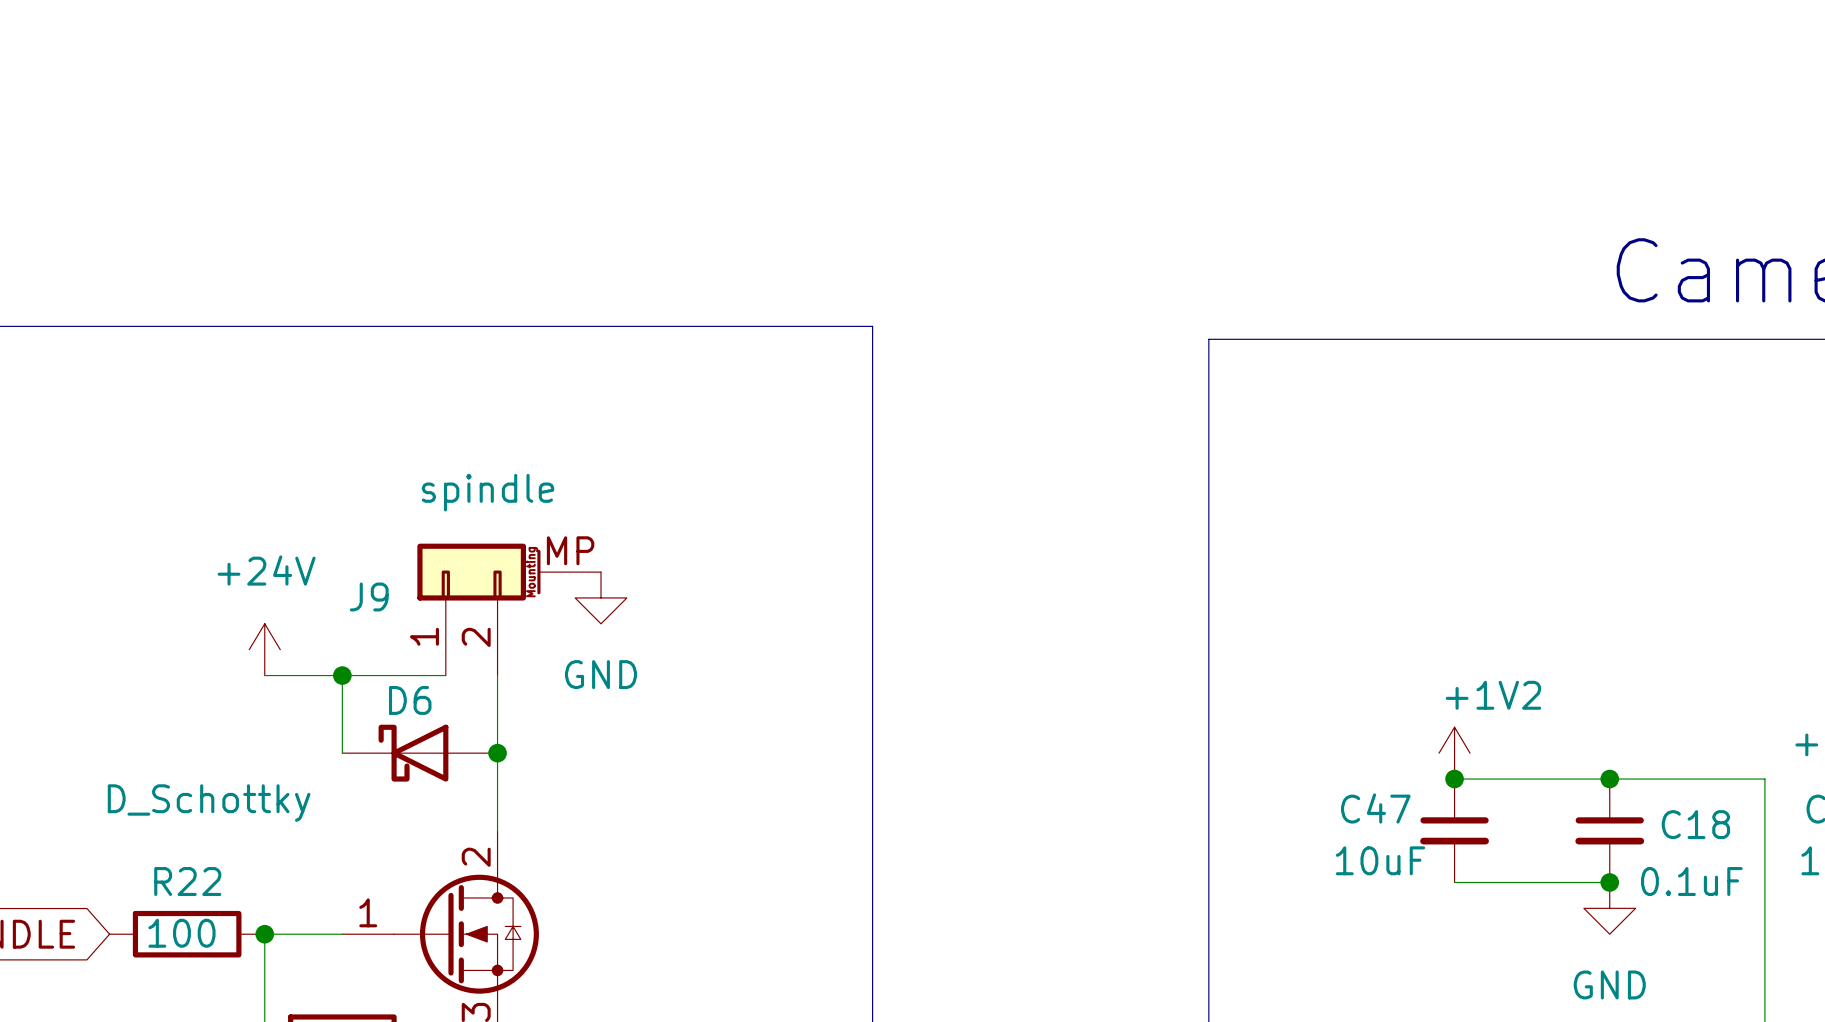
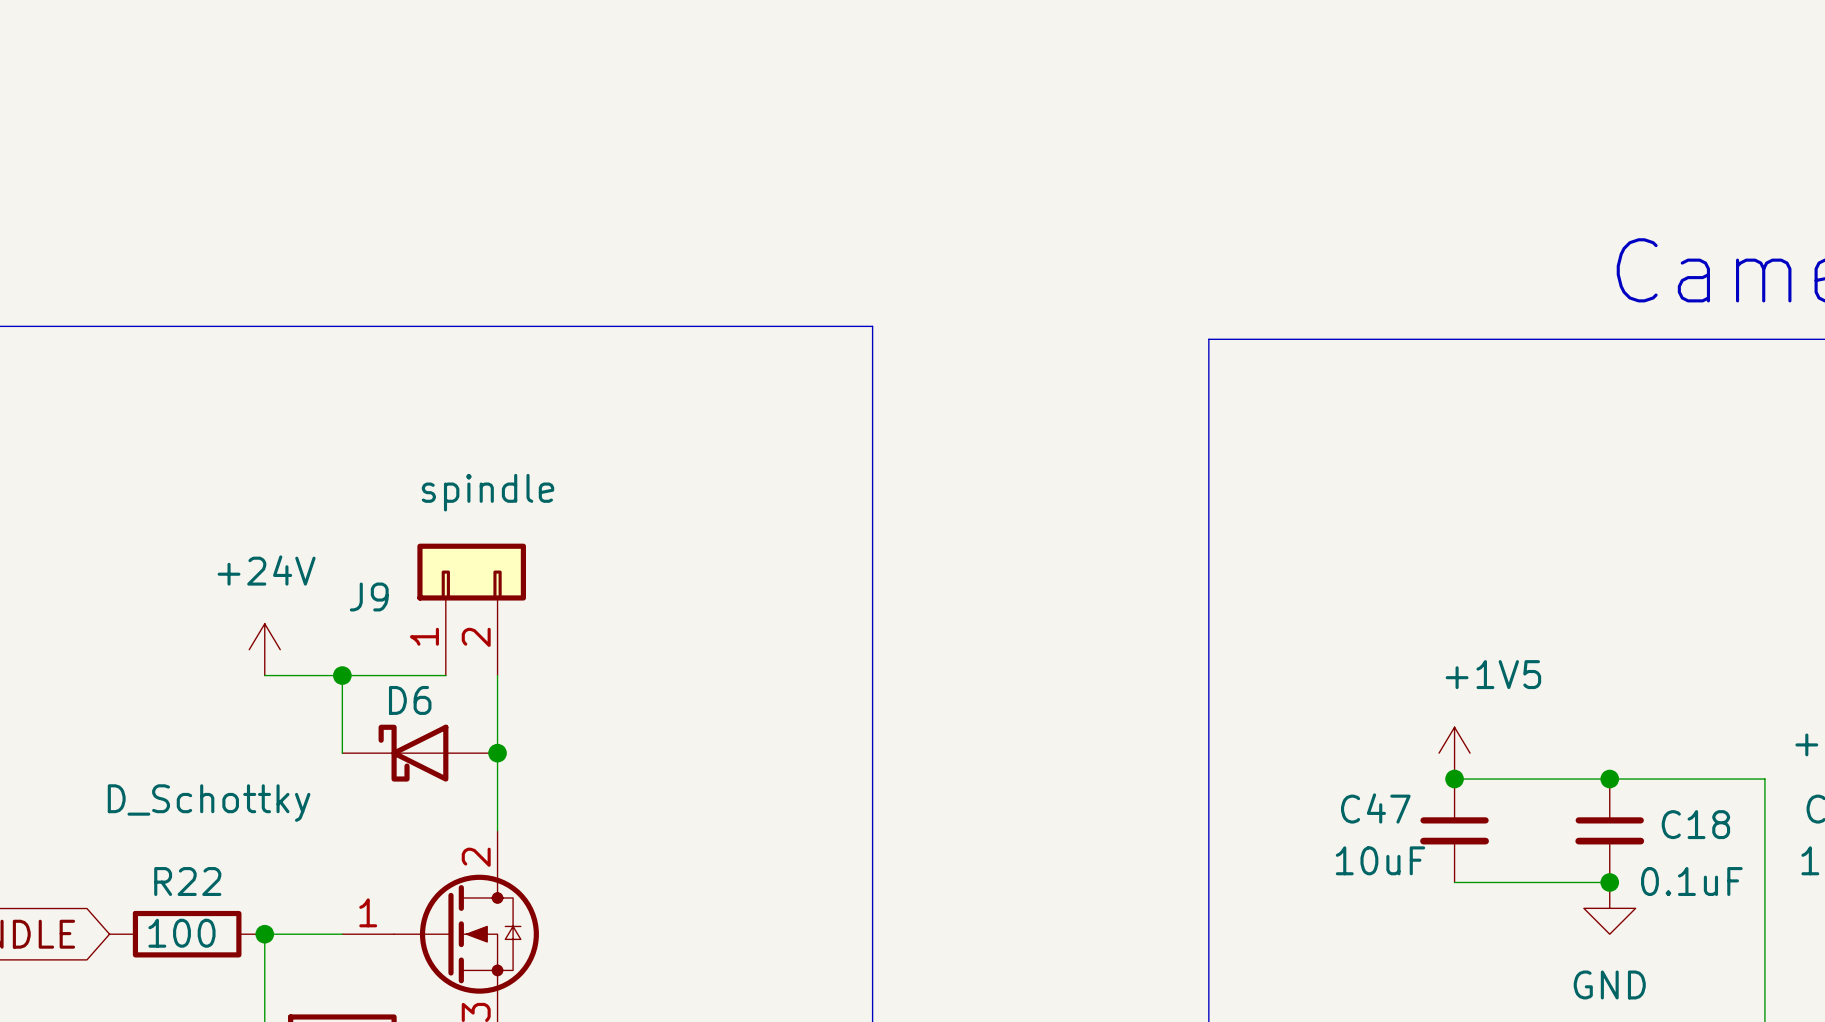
J9 symbol: [417, 543, 602, 676] -> [417, 543, 526, 676]
power symbol: GND (601, 597) -> none
power symbol: +1V2 (1454, 753) -> +1V5 (1454, 753)

